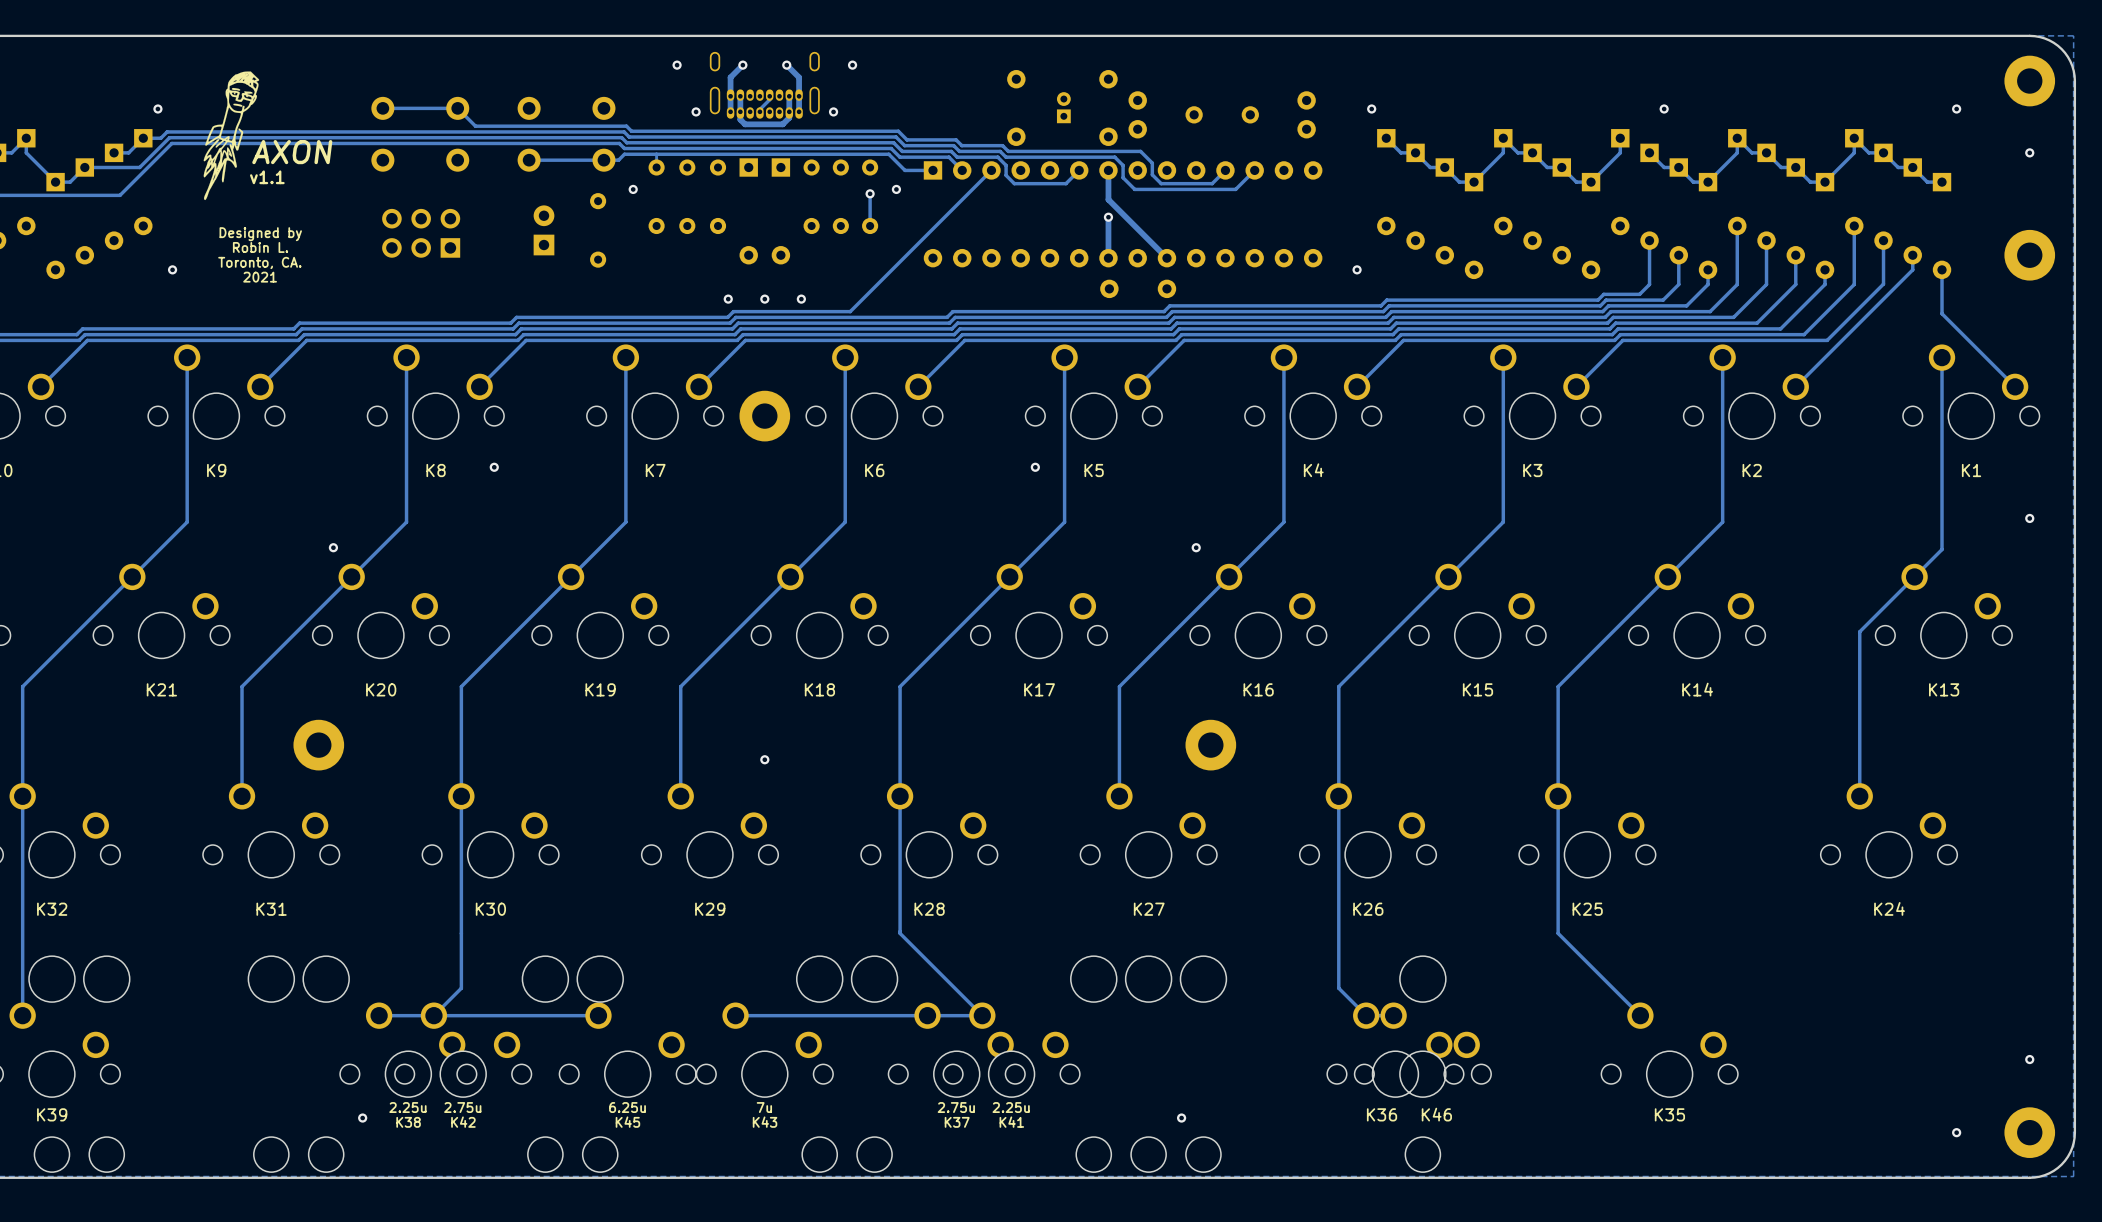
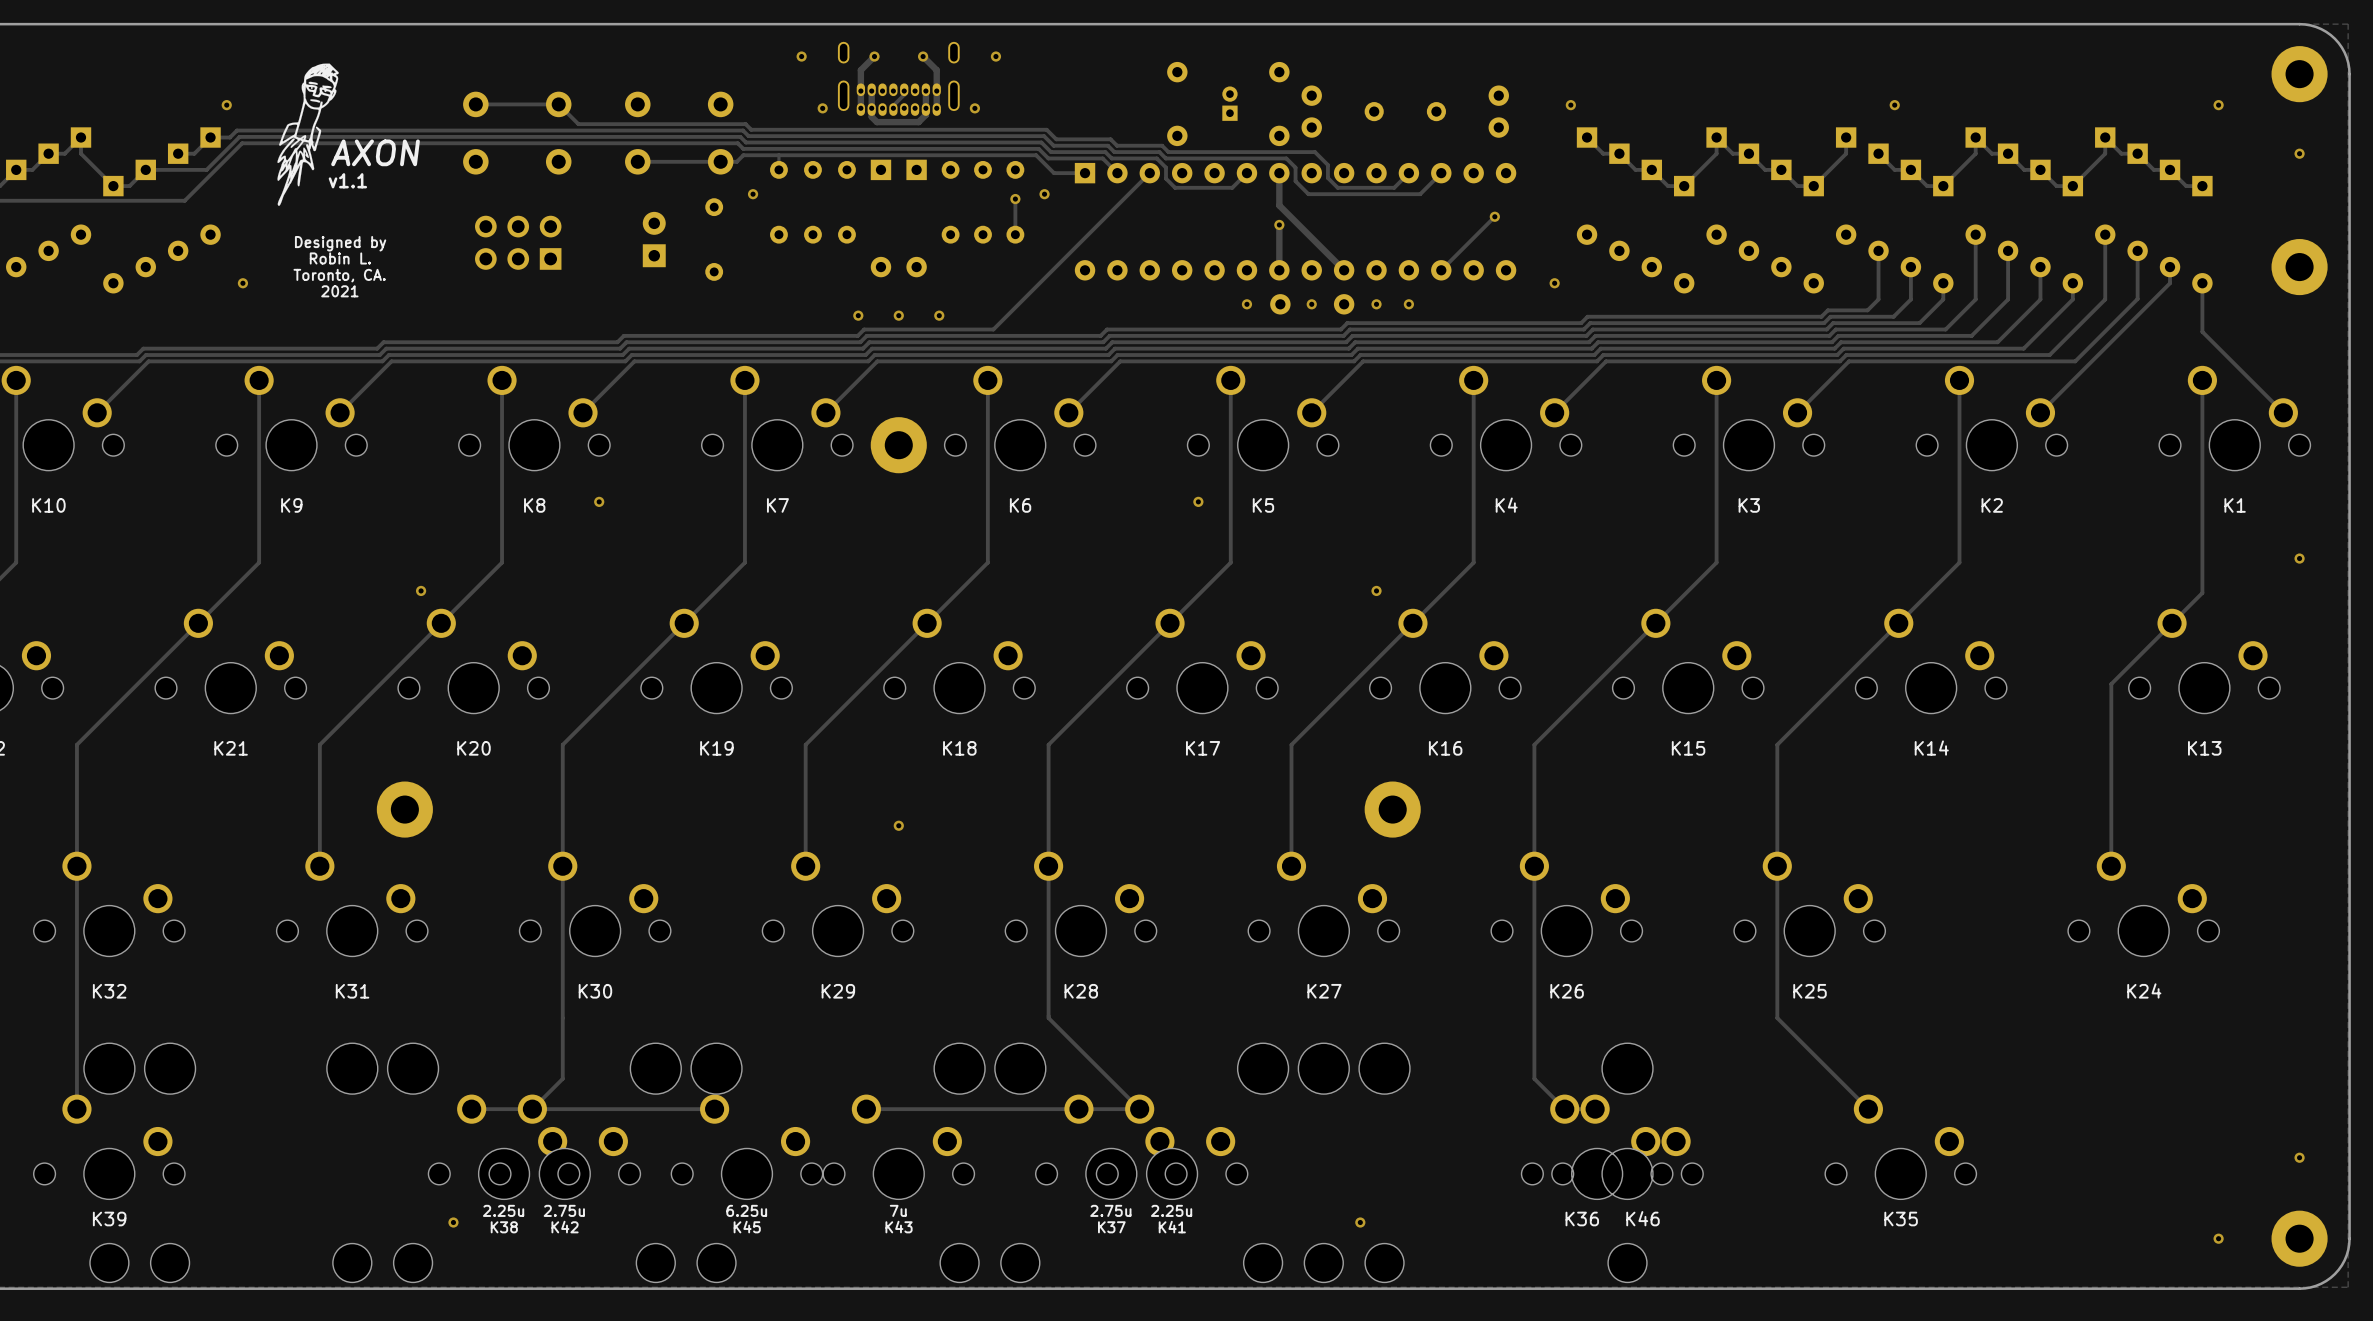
track: none -> (1494, 216) (1441, 270)
via: none -> (1494, 216)
via: none -> (1246, 304)
via: none -> (1311, 304)
via: none -> (1376, 304)
via: none -> (1408, 304)

